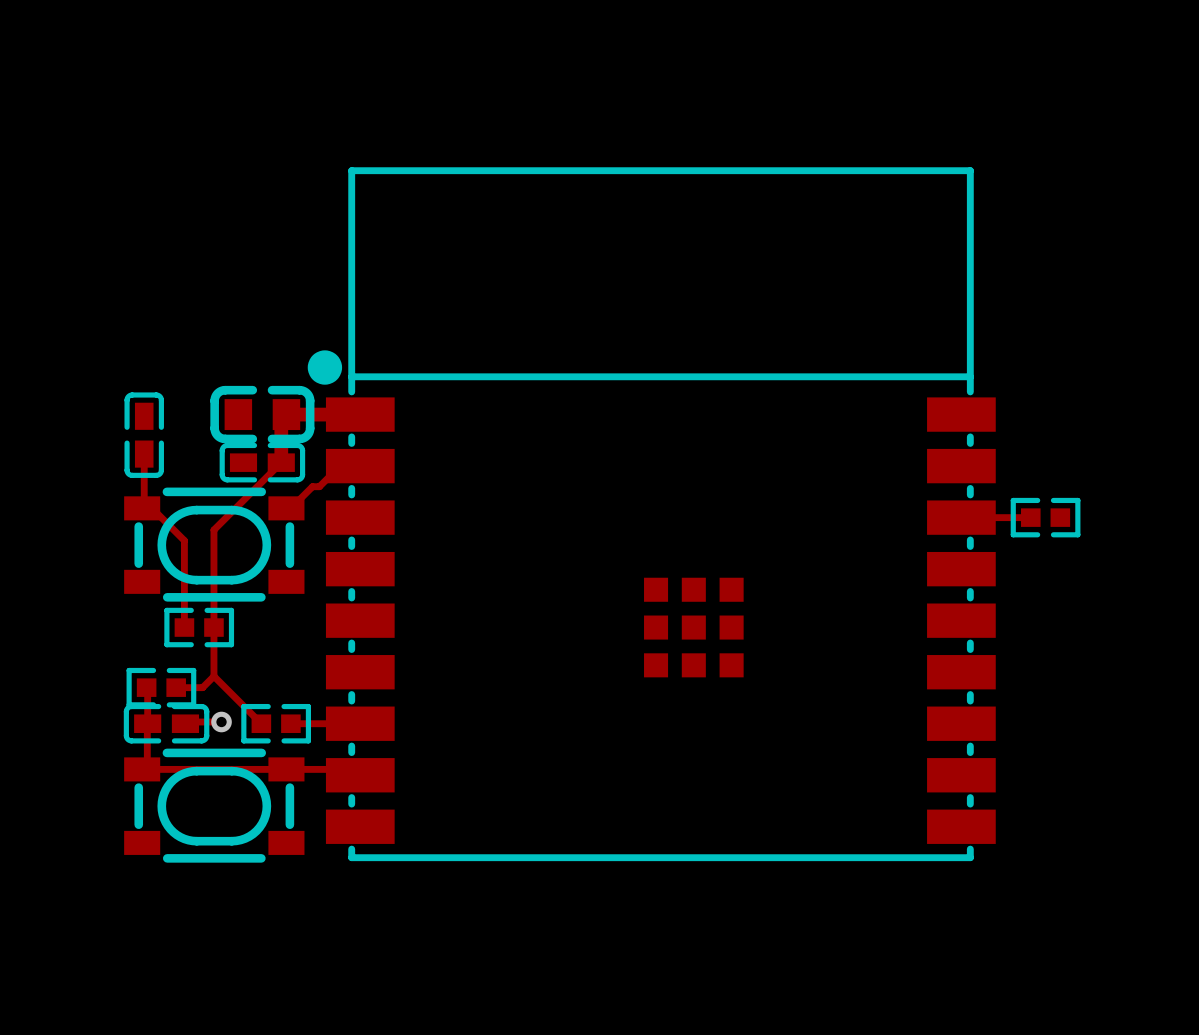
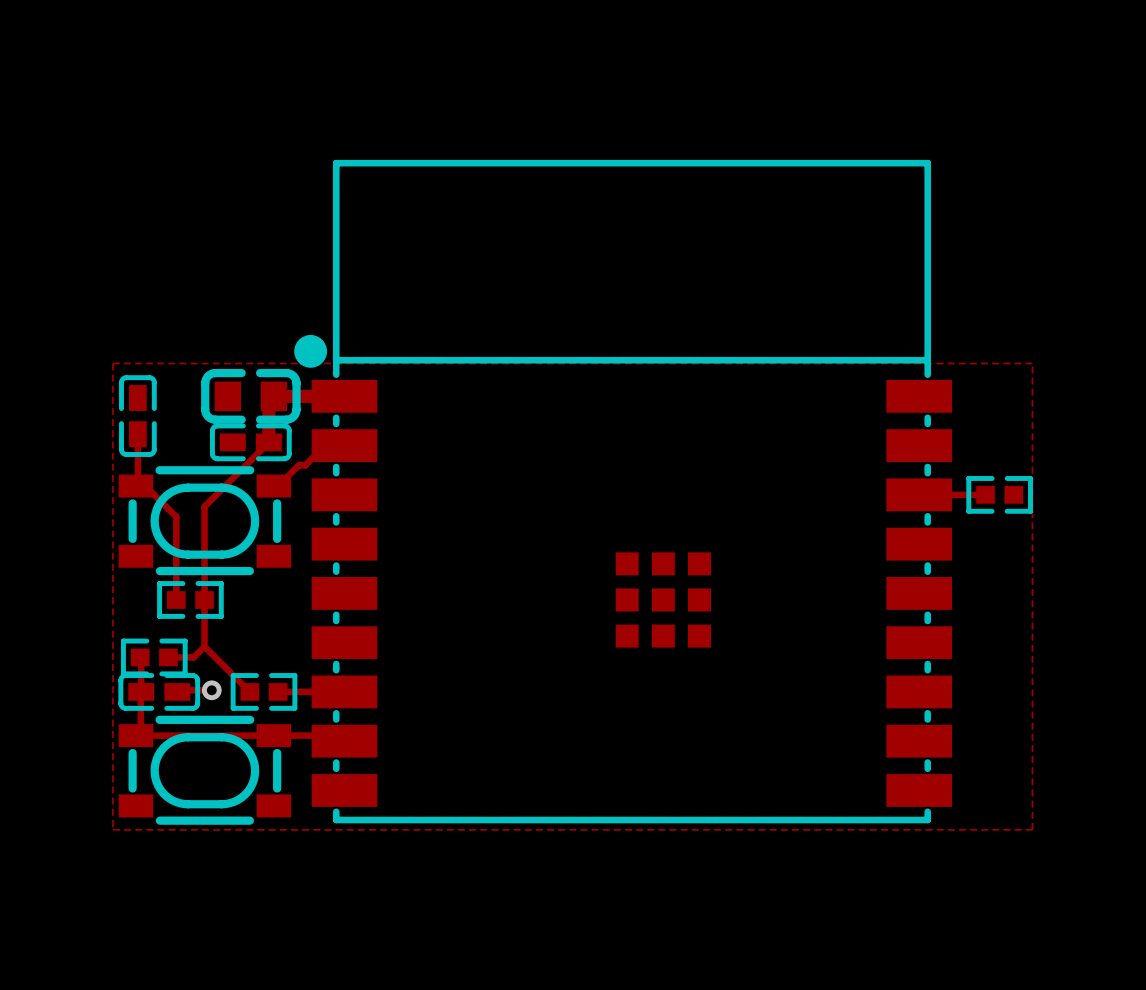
top zone outline: none -> (112, 363) (112, 829) (1032, 829) (1032, 363) (112, 363)

